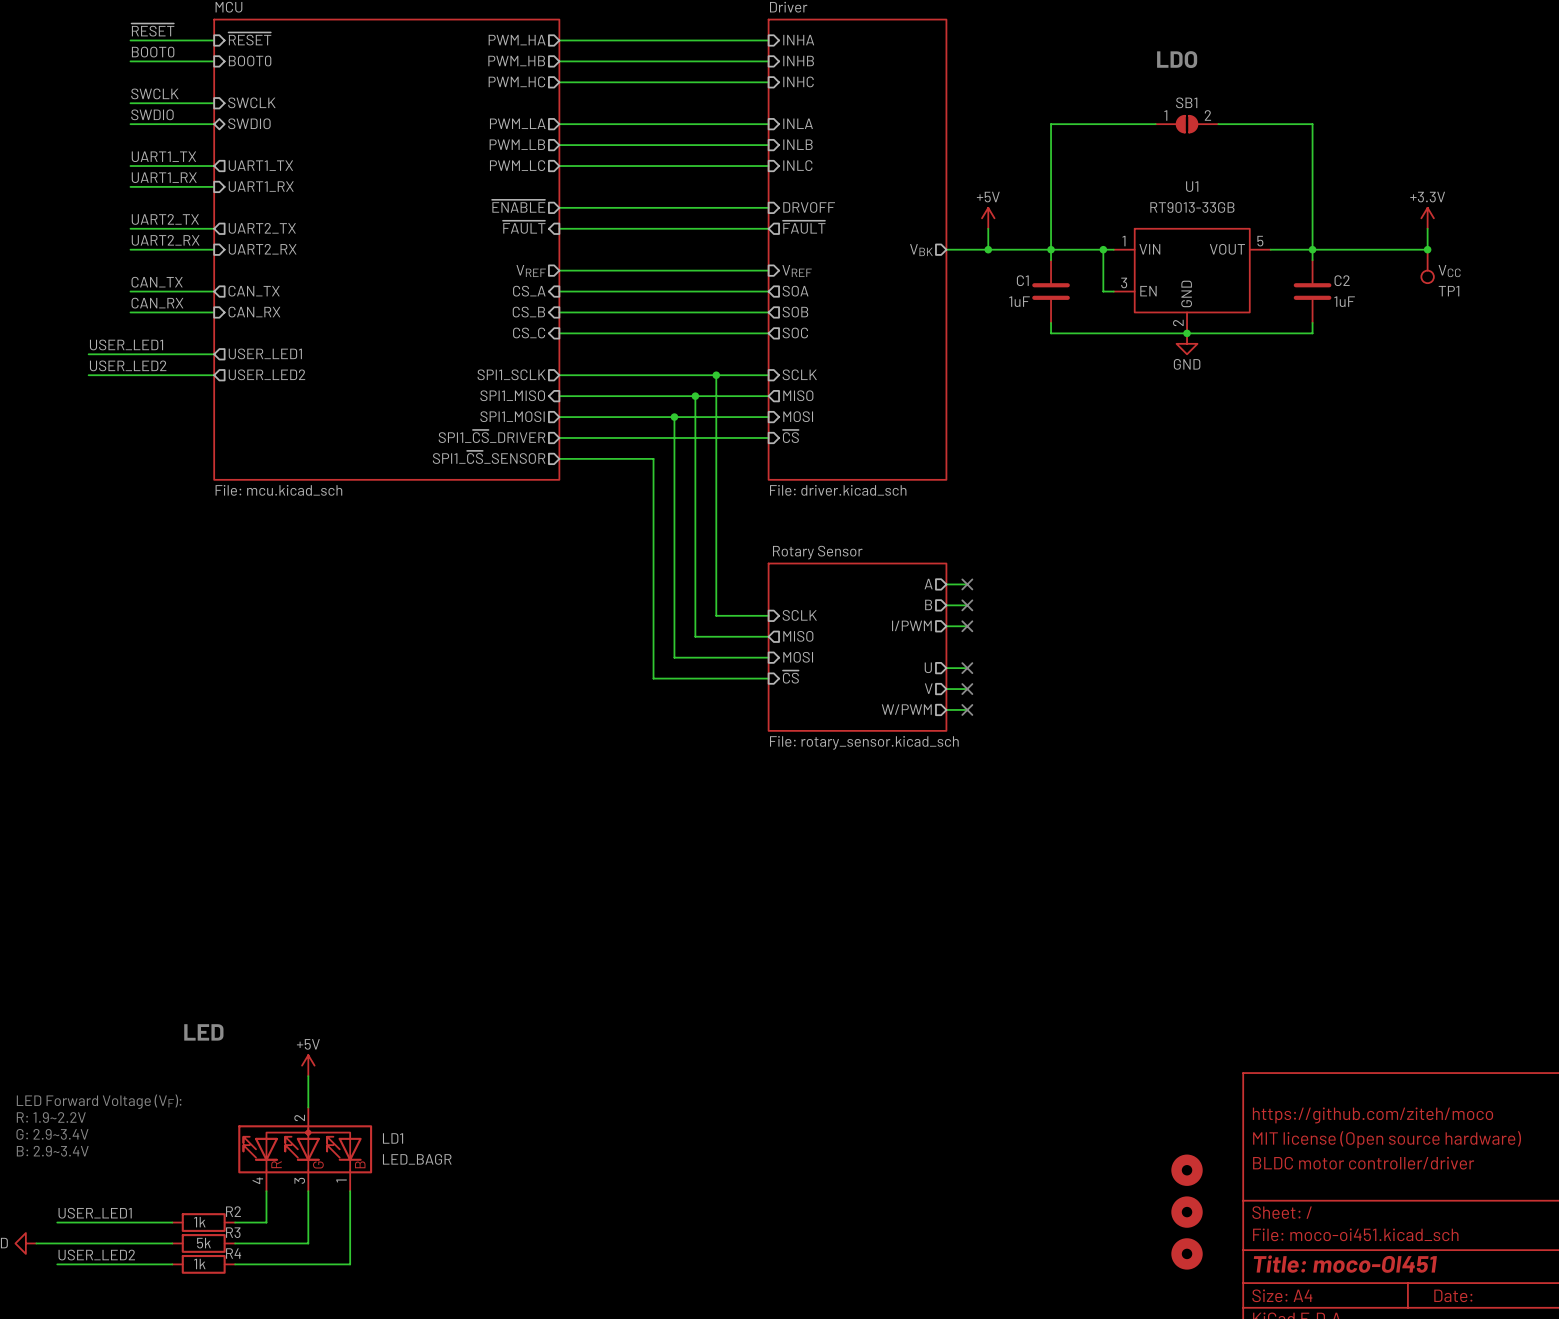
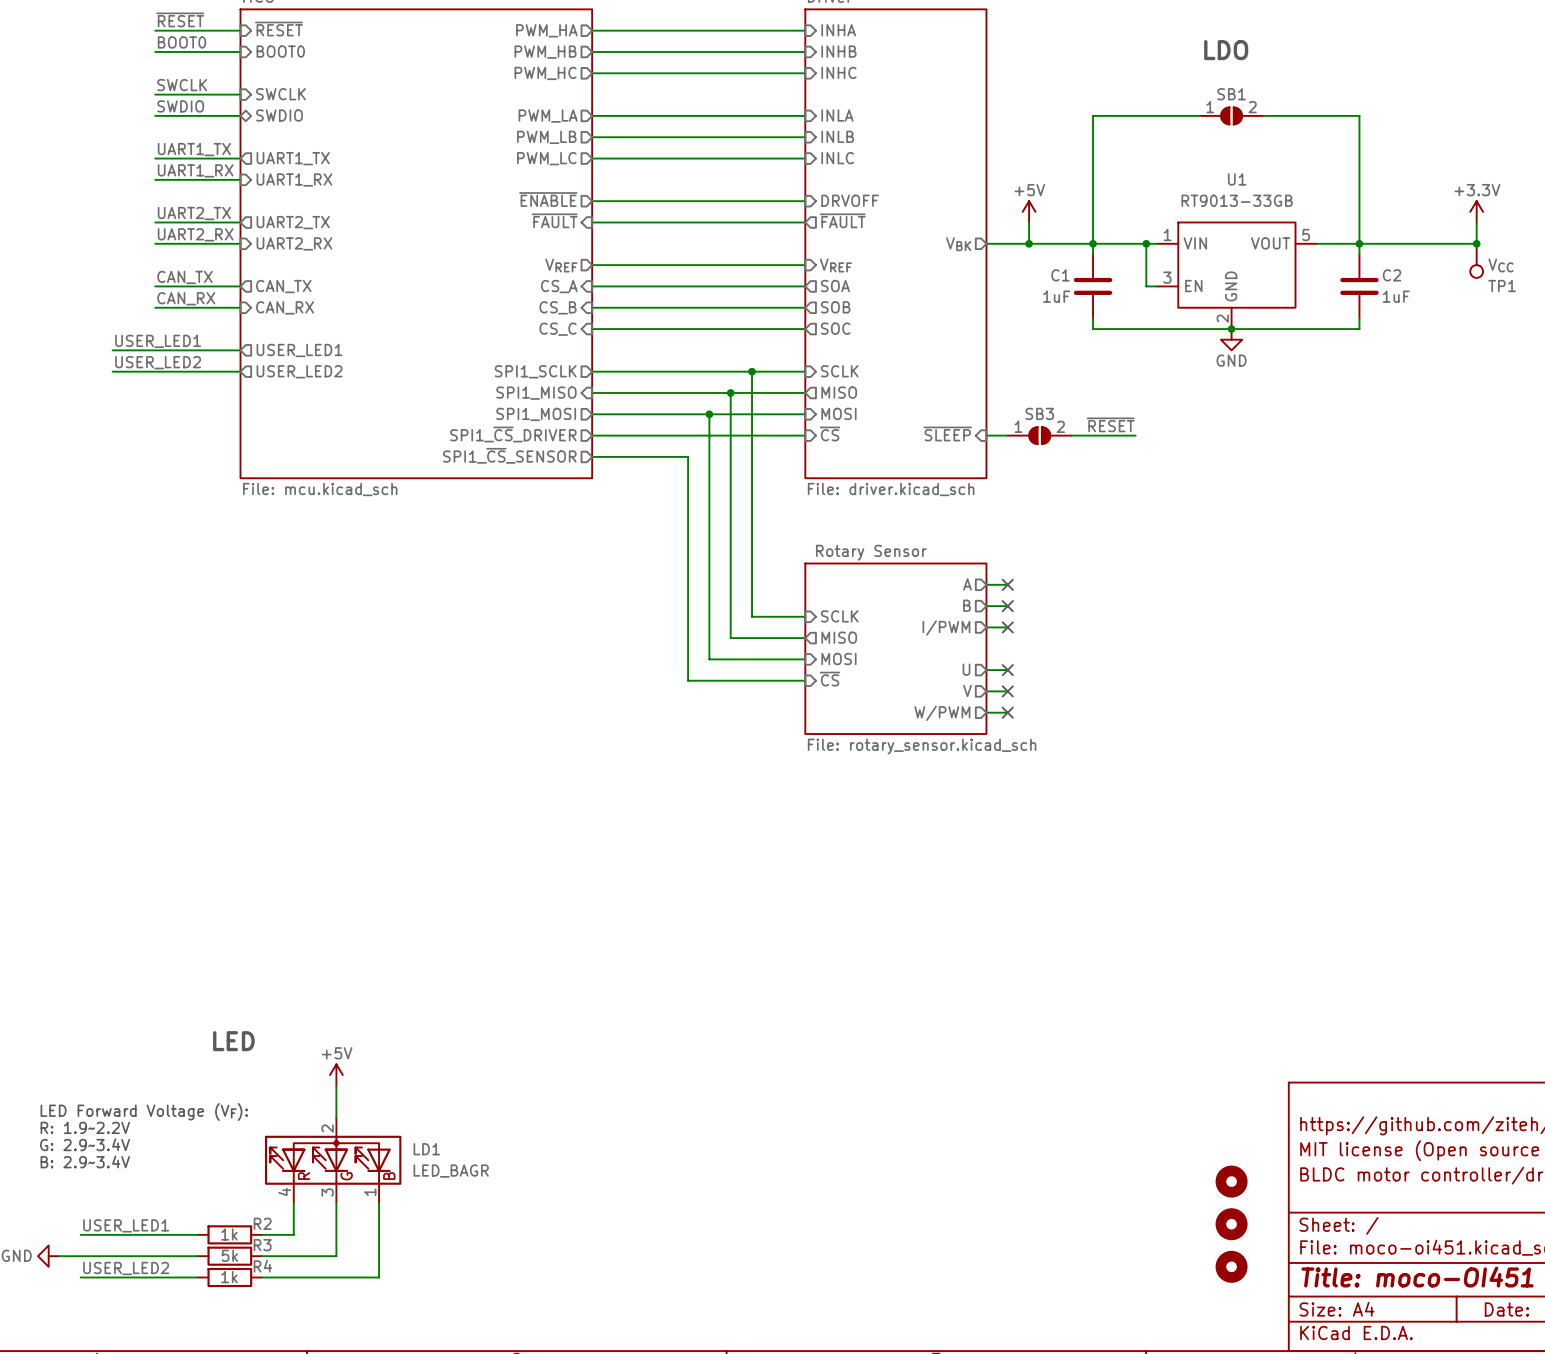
label: none -> ~{RESET} (1110, 424)
sheet pin: none -> ~{SLEEP} (947, 433)
wire: none -> (986, 435) (1007, 435)
SB3: none -> (1039, 435)
wire: none -> (1071, 435) (1135, 435)

